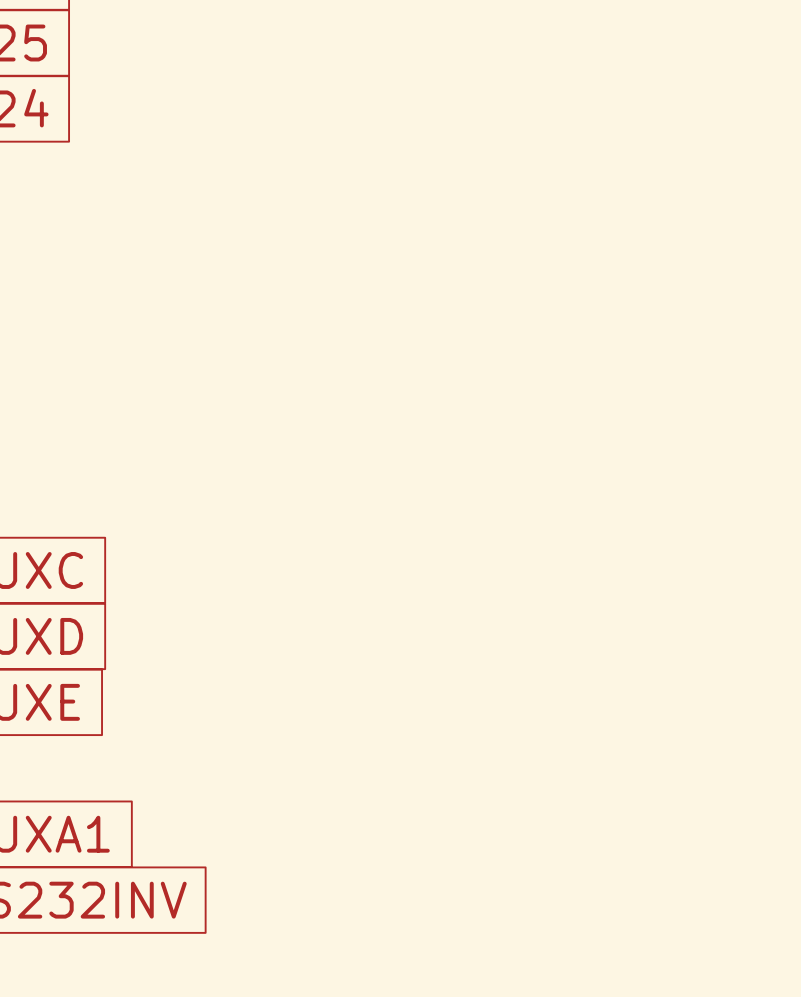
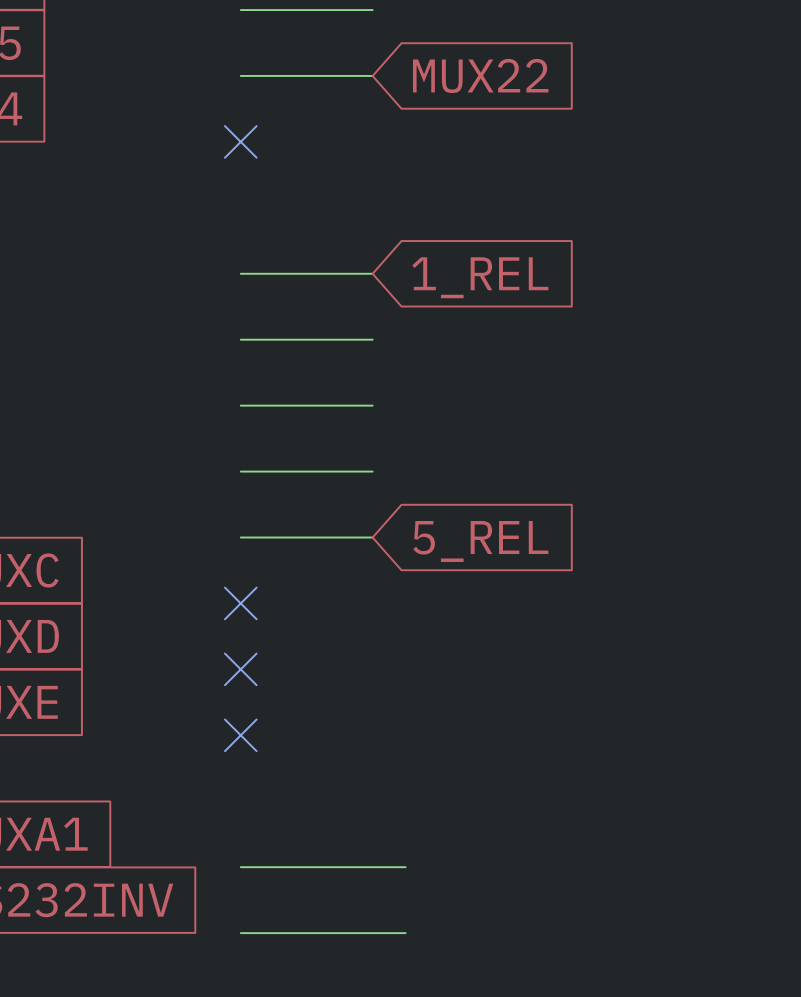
wire: none -> (240, 10) (372, 10)
wire: none -> (240, 75) (372, 75)
global label: none -> MUX22 (480, 75)
no-connect mark: none -> (240, 141)
wire: none -> (240, 273) (372, 273)
global label: none -> 1_REL (480, 277)
wire: none -> (240, 339) (372, 339)
wire: none -> (240, 405) (372, 405)
wire: none -> (240, 471) (372, 471)
wire: none -> (240, 537) (372, 537)
global label: none -> 5_REL (480, 541)
no-connect mark: none -> (240, 603)
no-connect mark: none -> (240, 669)
no-connect mark: none -> (240, 735)
wire: none -> (240, 867) (405, 867)
wire: none -> (240, 933) (405, 933)

